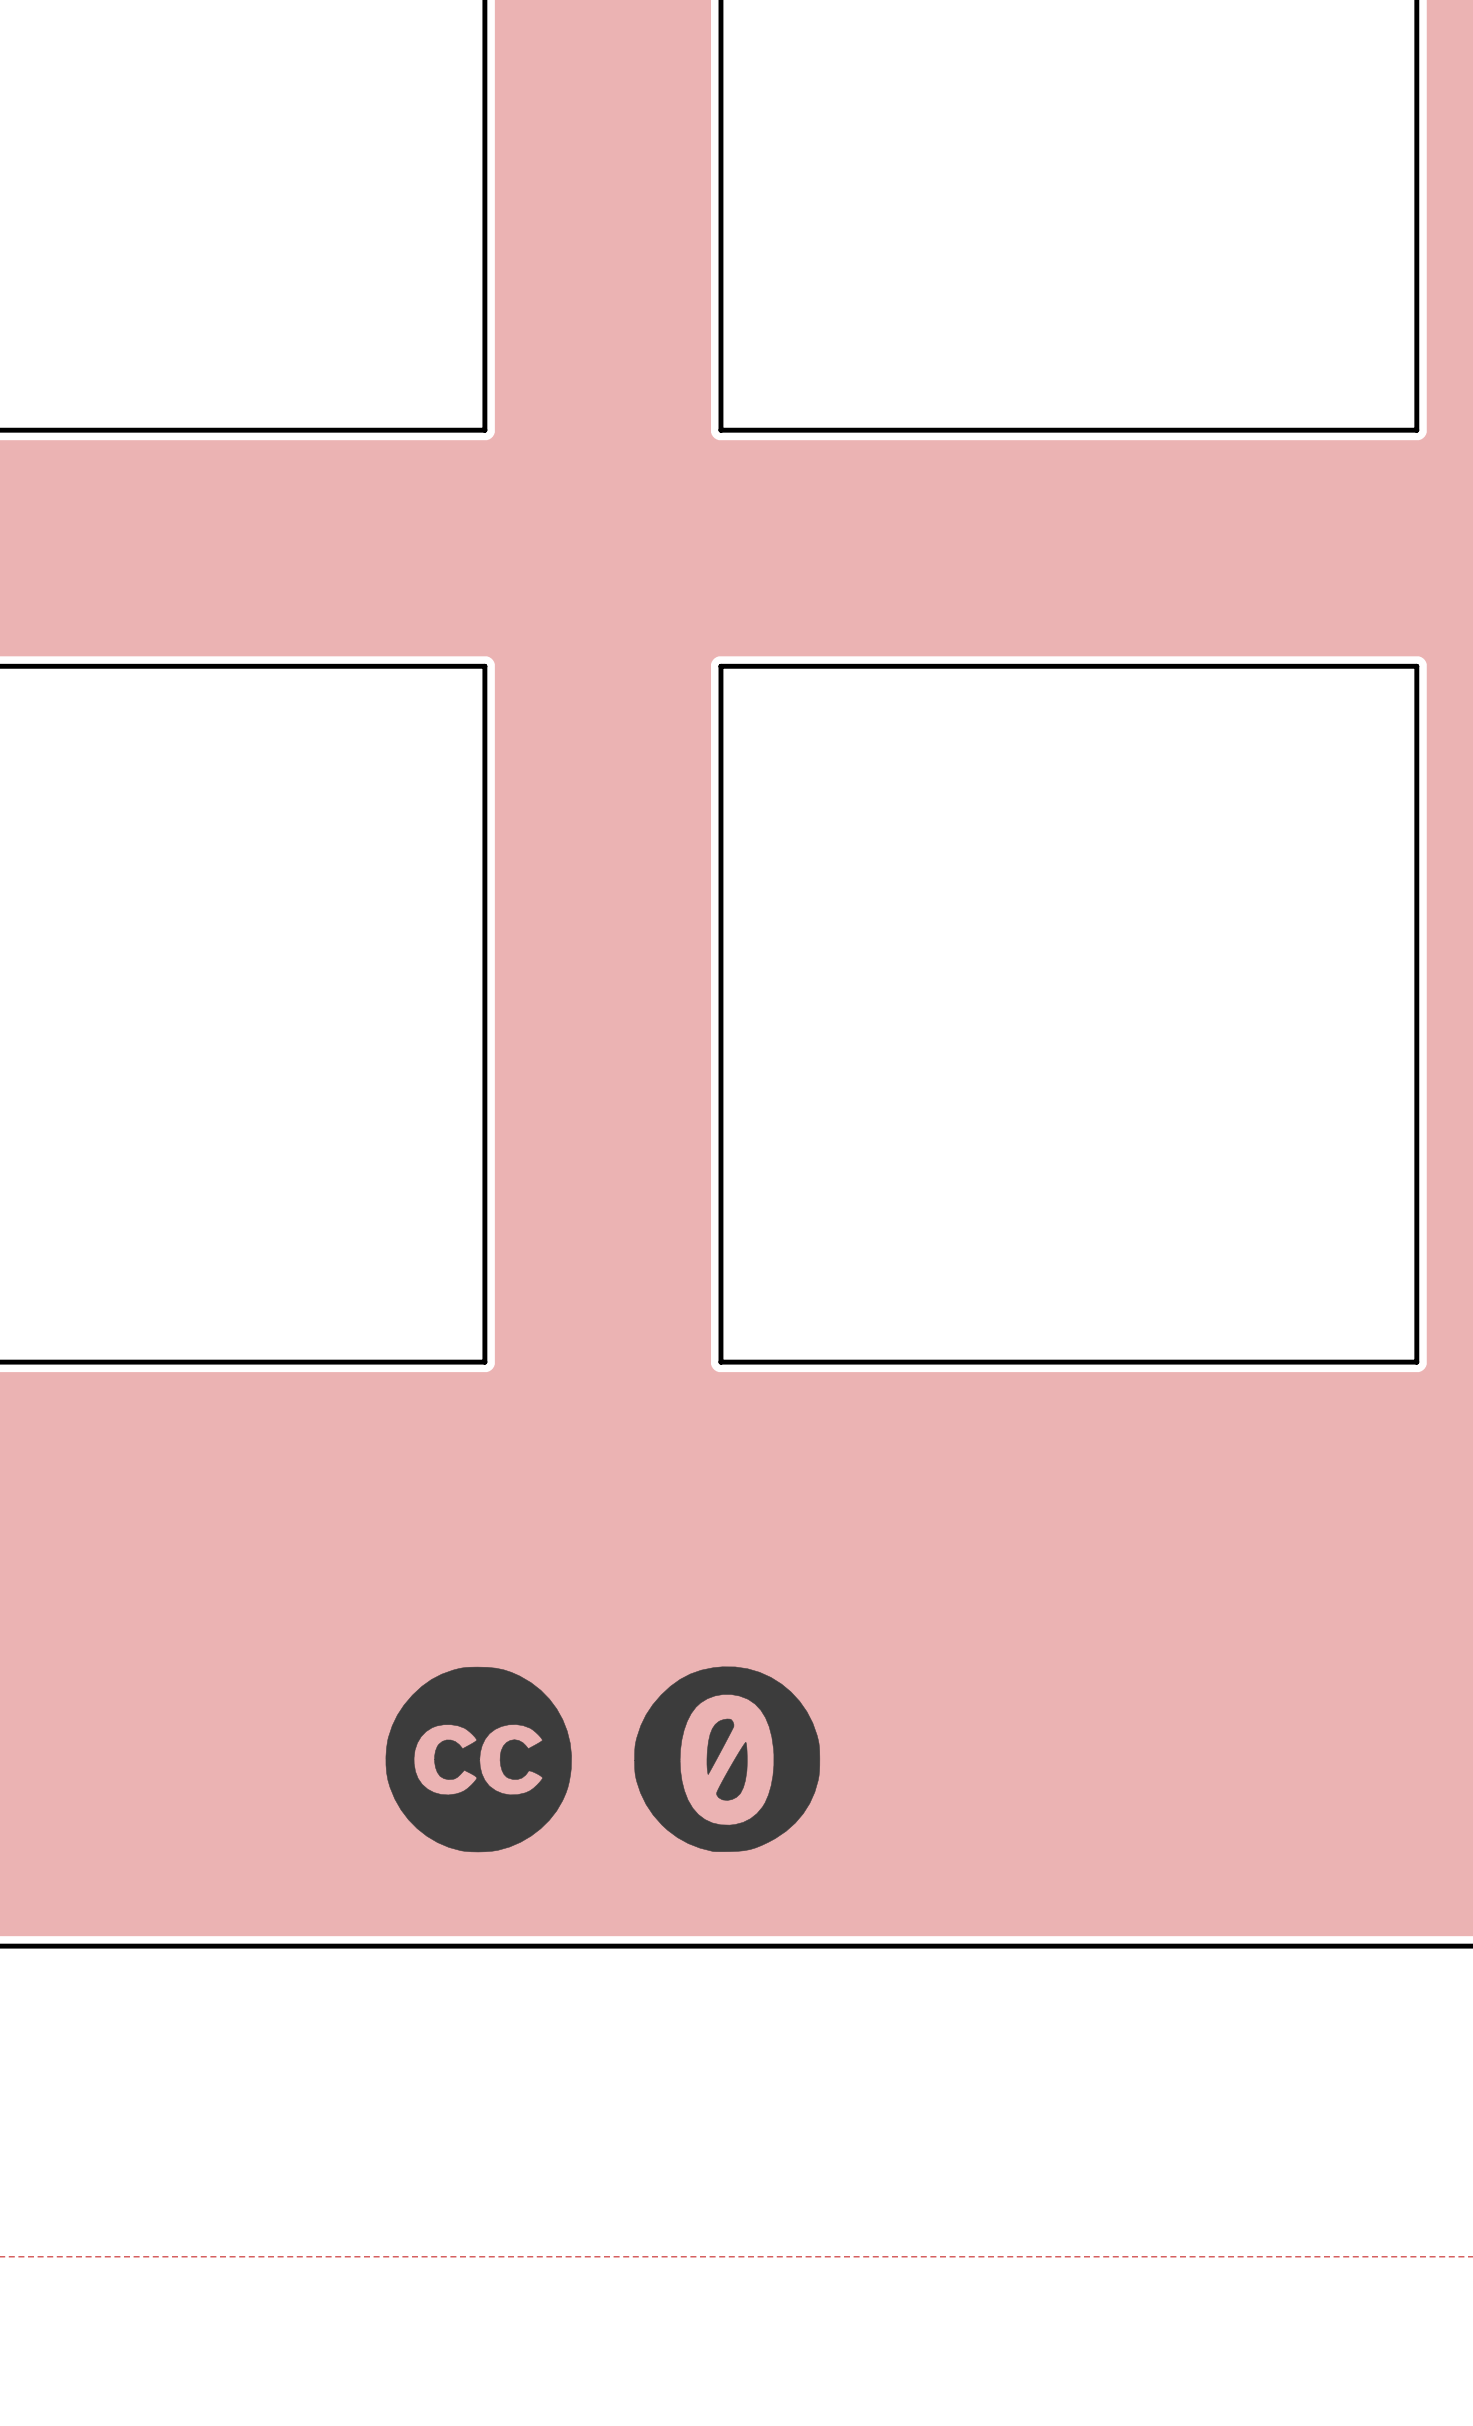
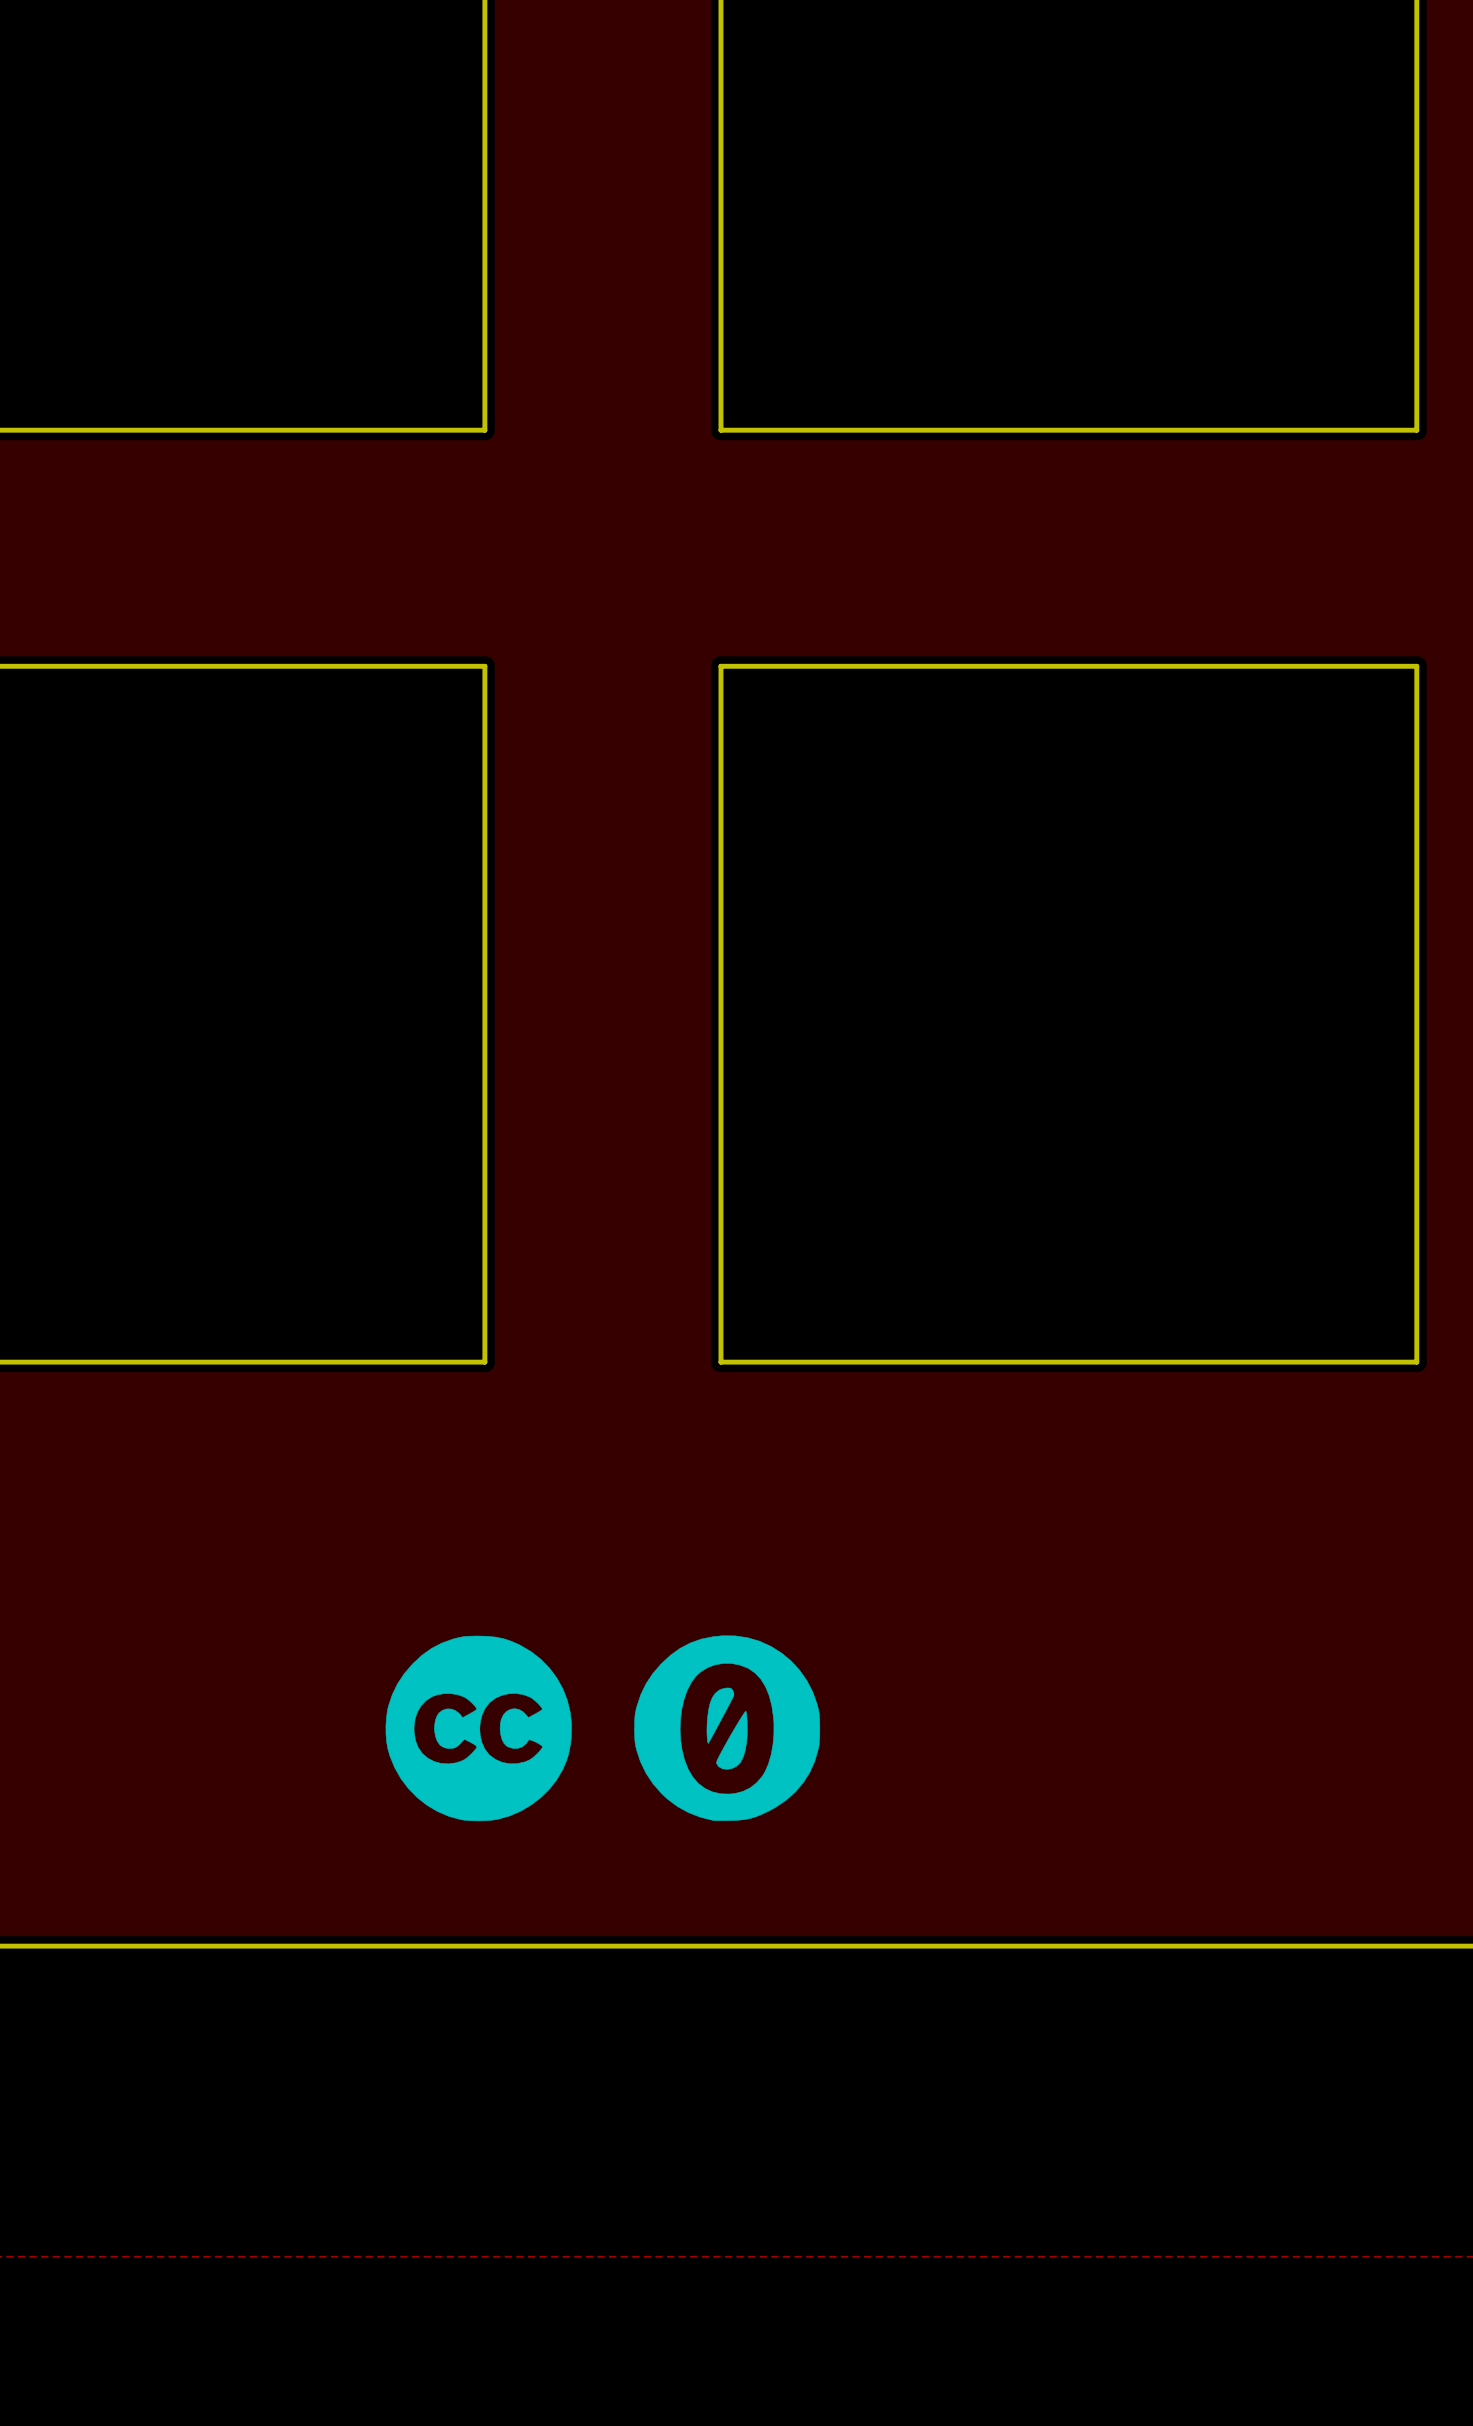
drawing position: (478, 1759) -> (478, 1728)
drawing position: (727, 1759) -> (727, 1728)

